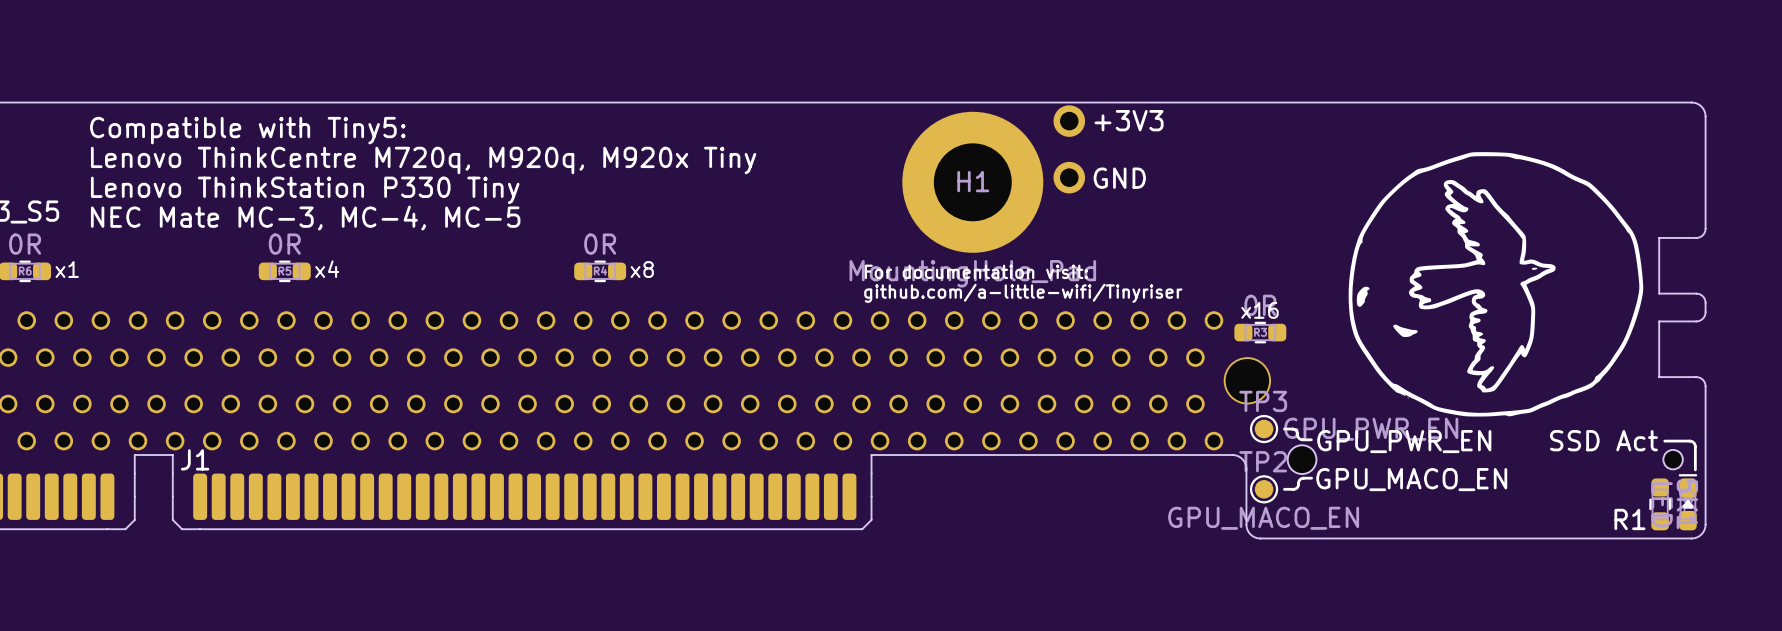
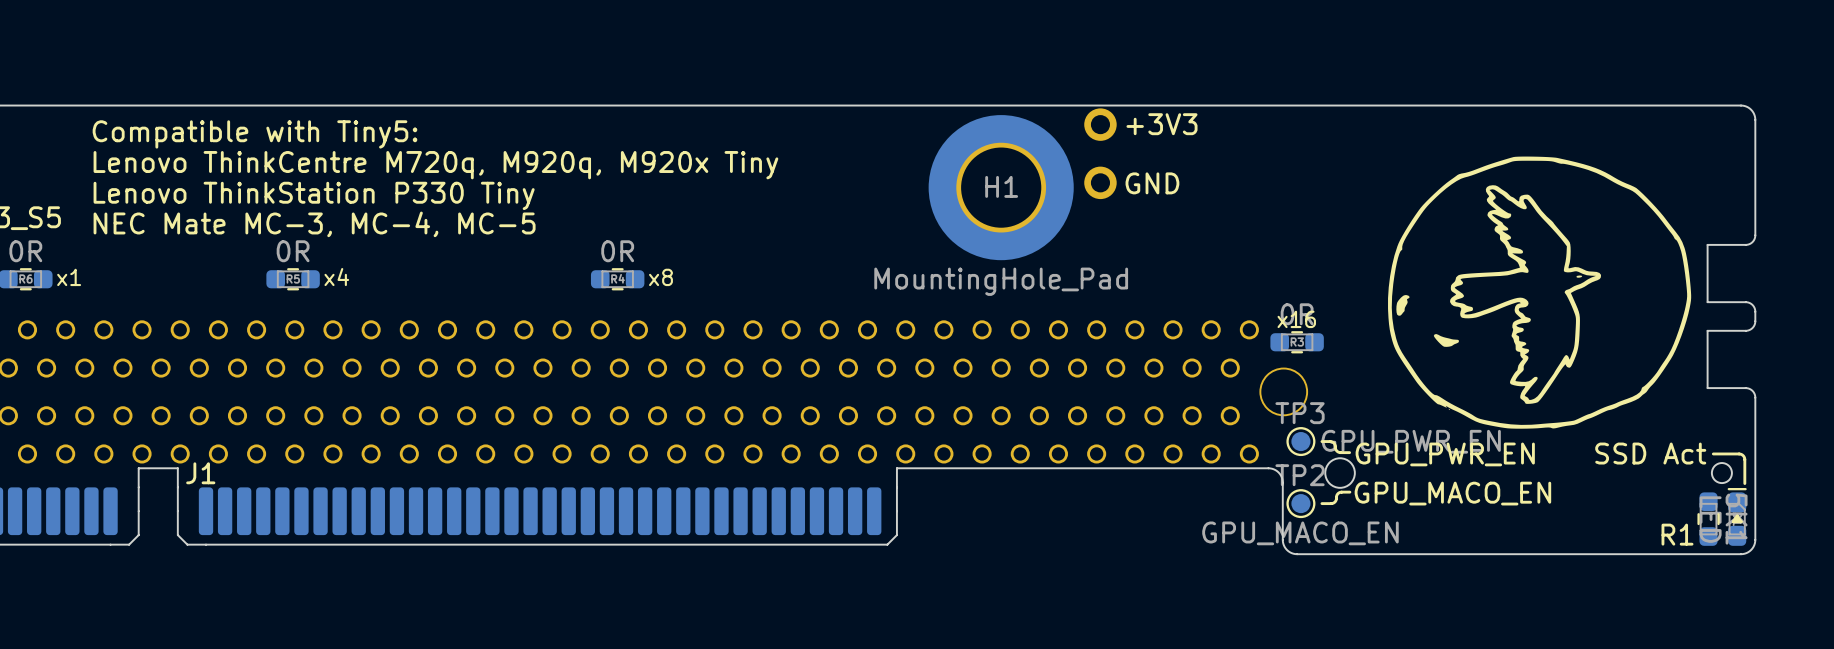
text: For documentation visit: (976, 271) -> none
text: github.com/a-little-wifi/Tinyriser (1023, 293) -> none

